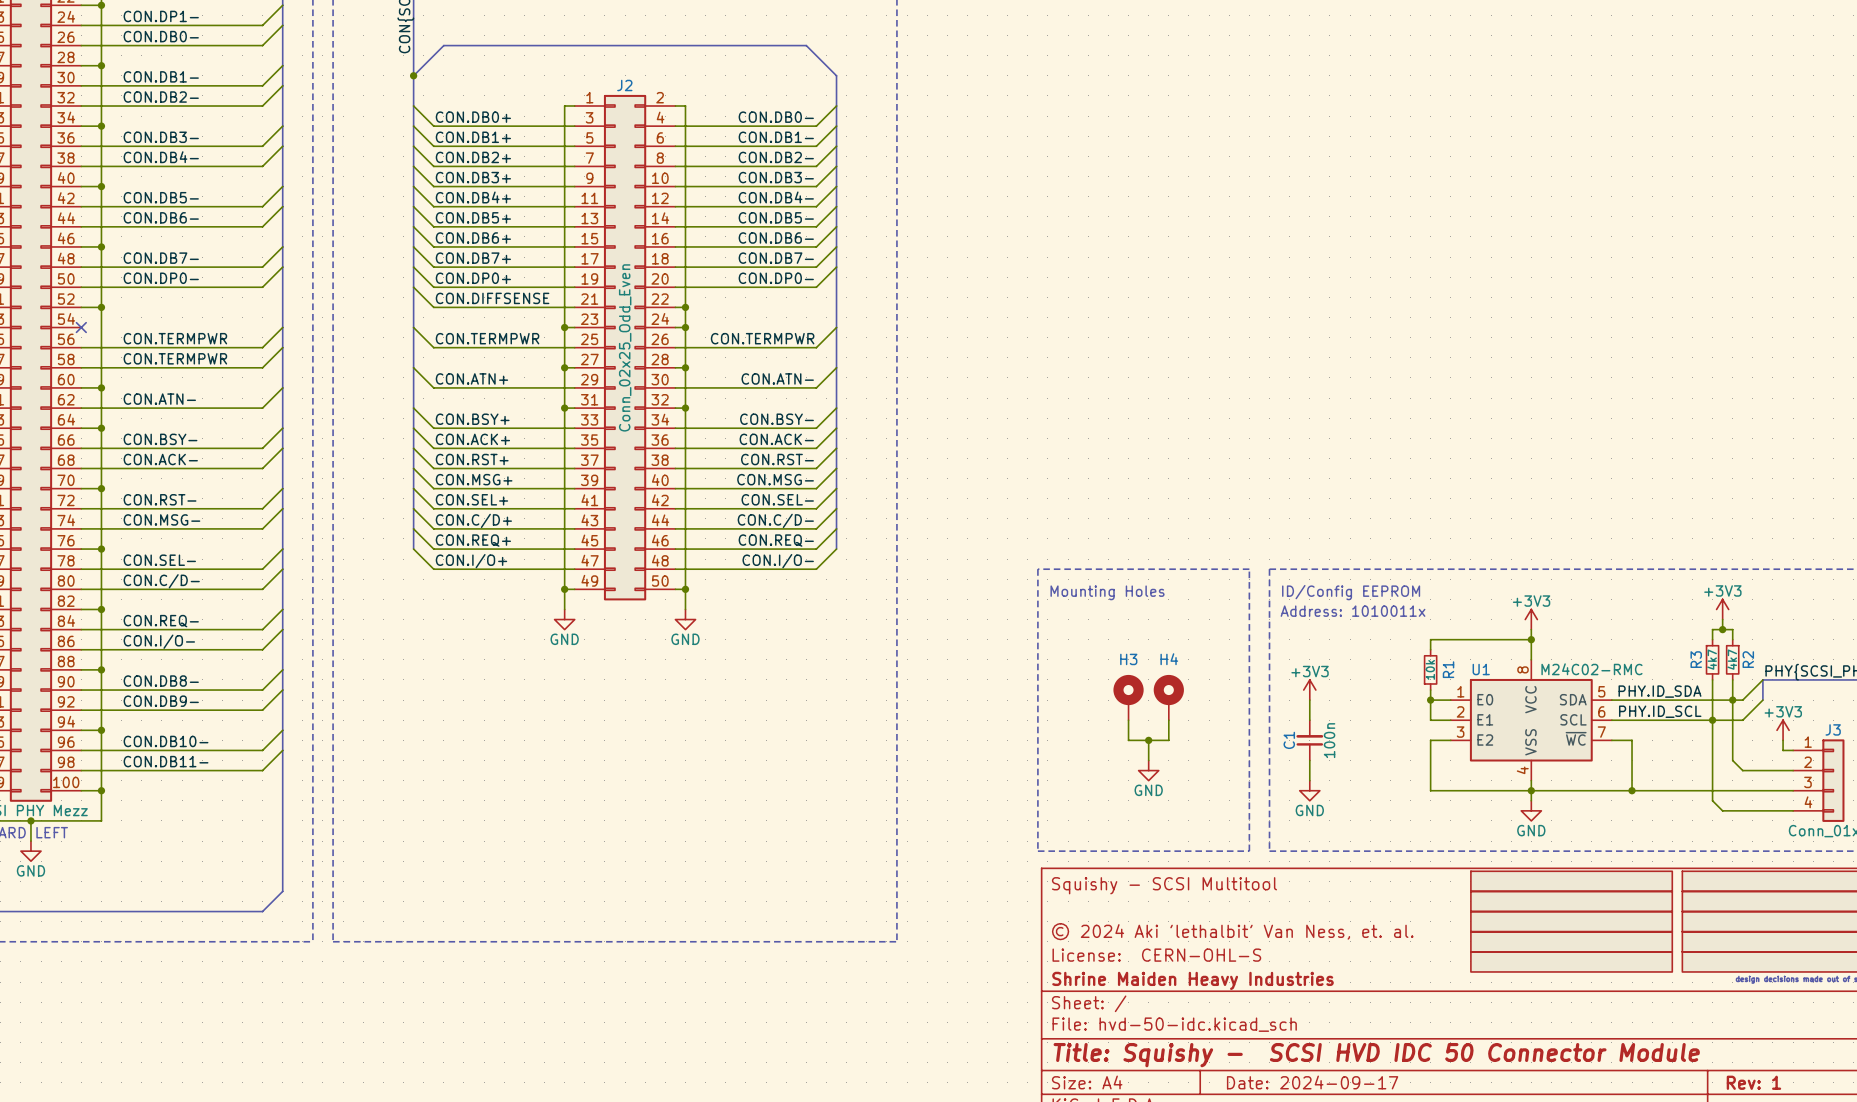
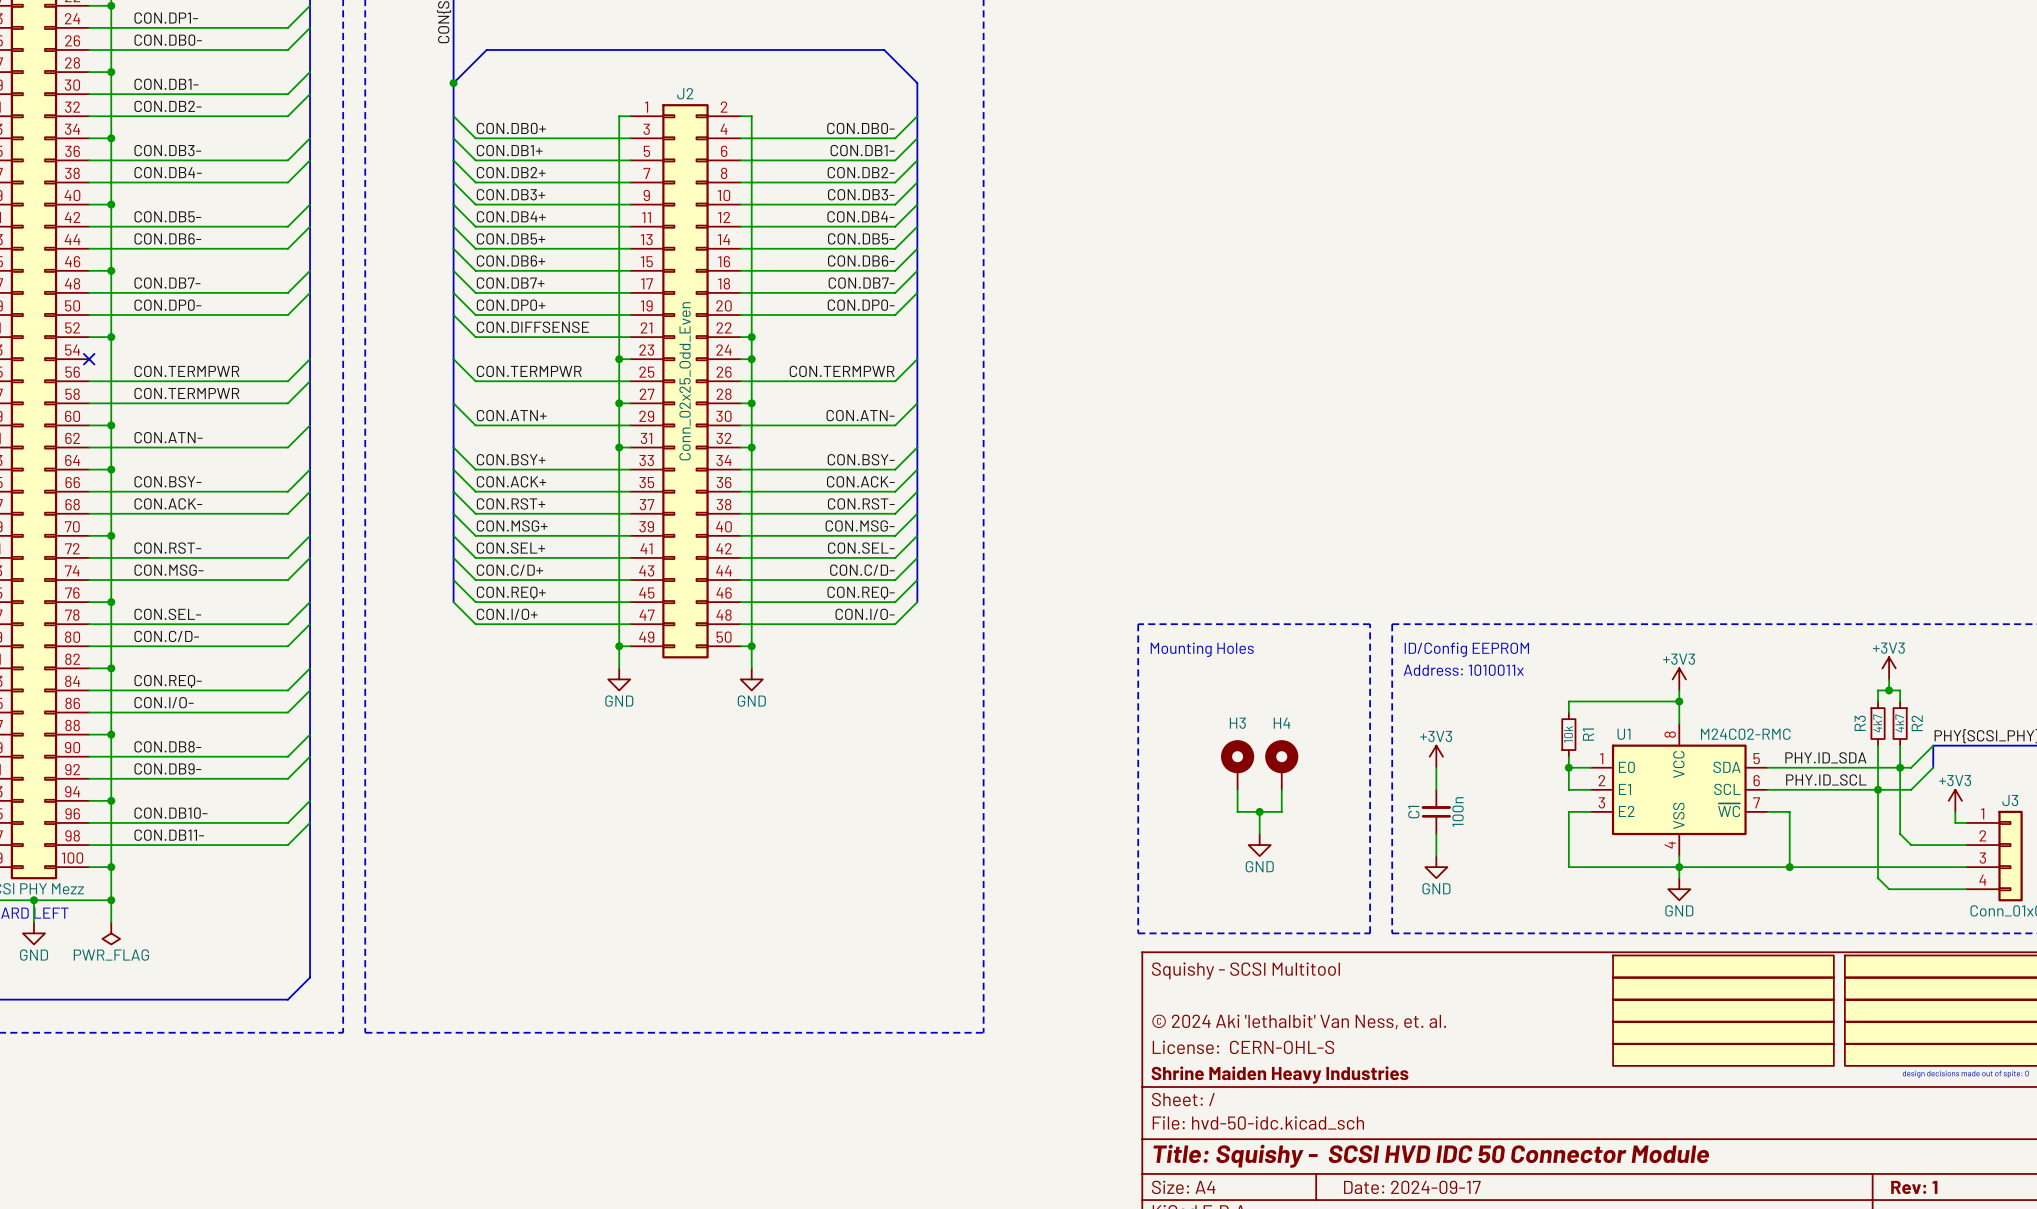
wire: none -> (111, 900) (111, 922)
junction: none -> (111, 900)
power symbol: none -> PWR_FLAG (111, 933)

